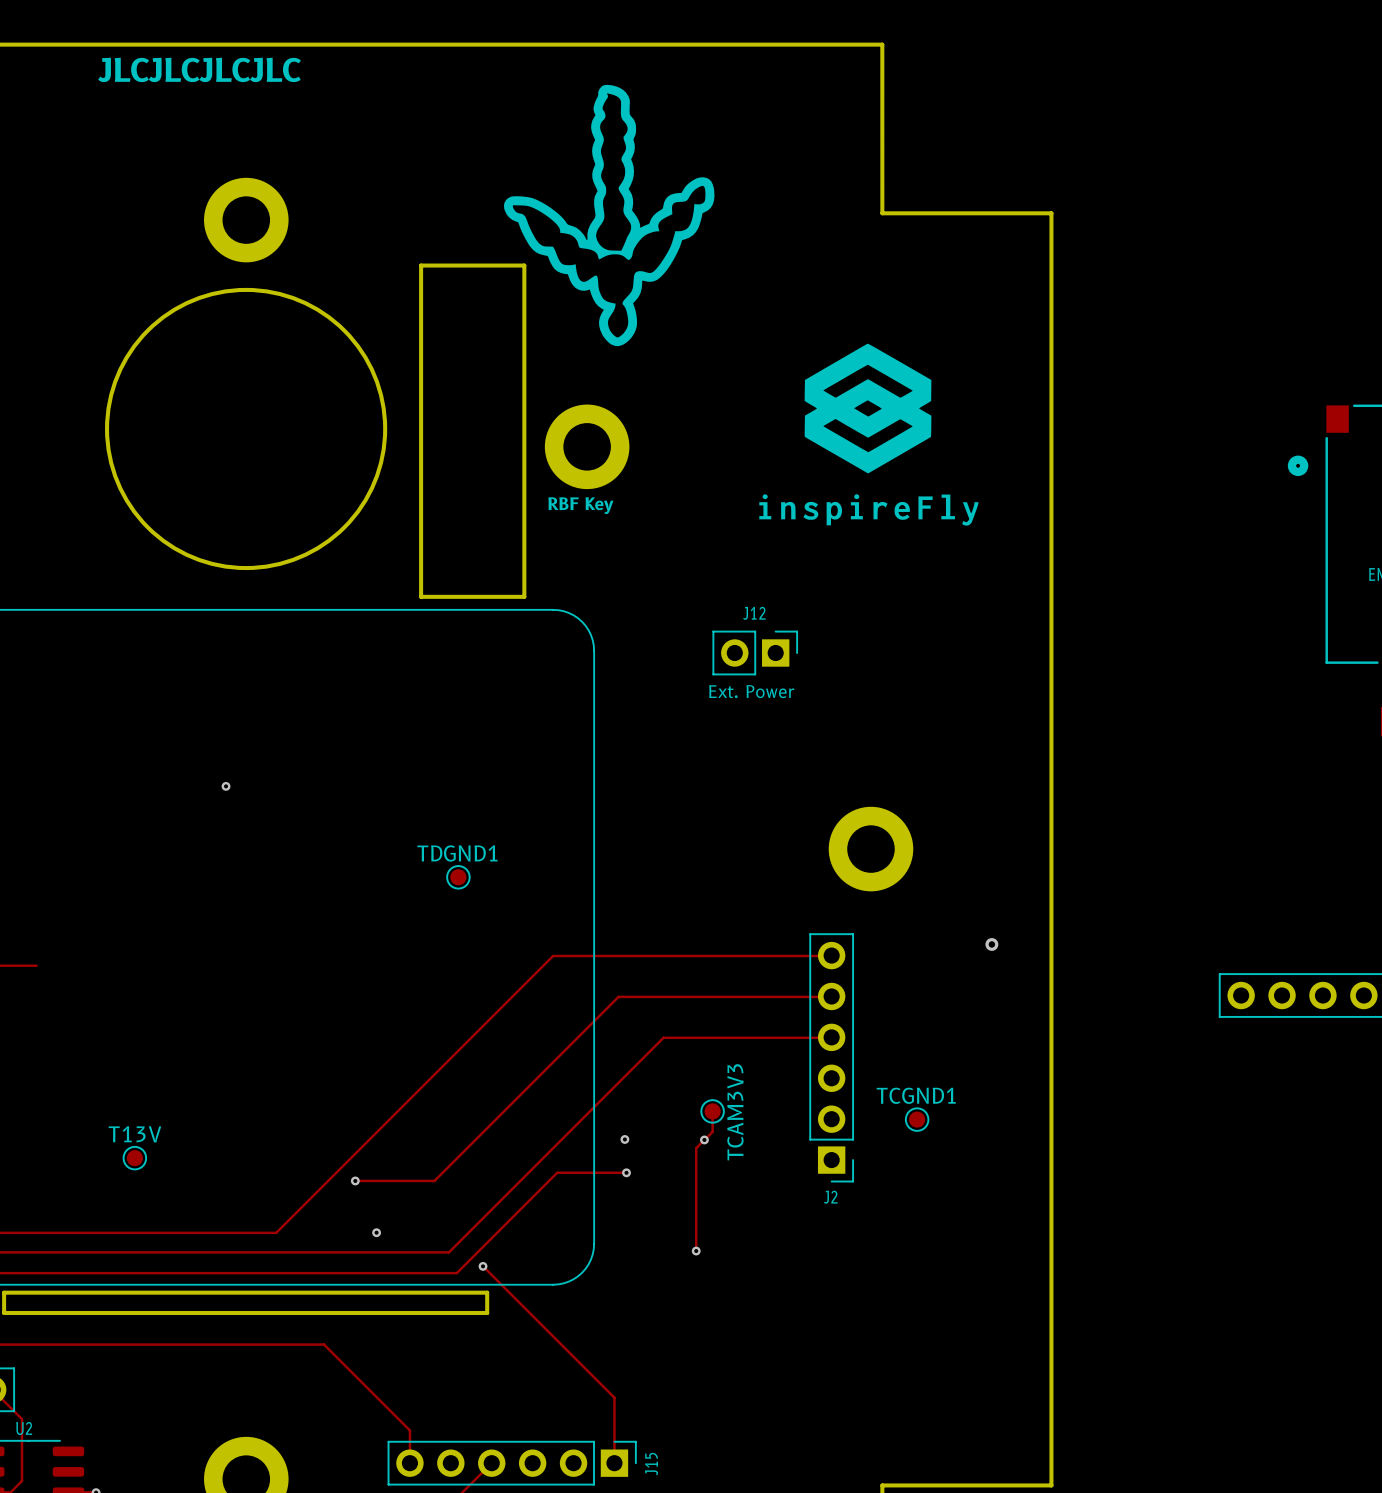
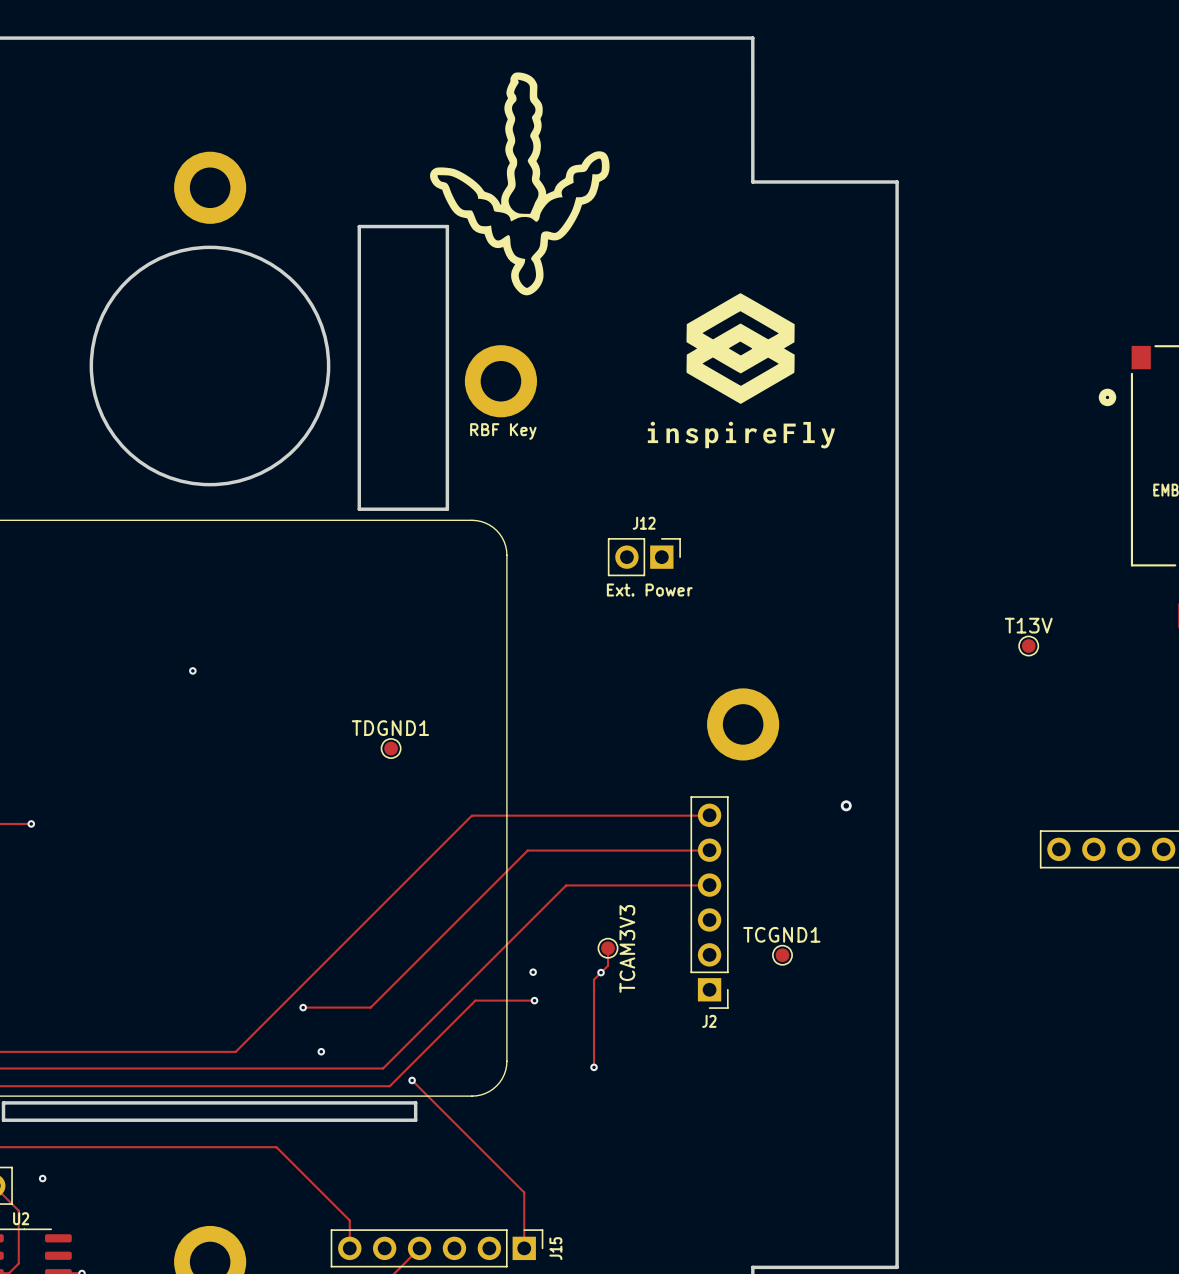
text: JLCJLCJLCJLC (199, 69) -> none
via: none -> (31, 823)
T13V position: (134, 1158) -> (1028, 646)
via: none -> (42, 1178)

